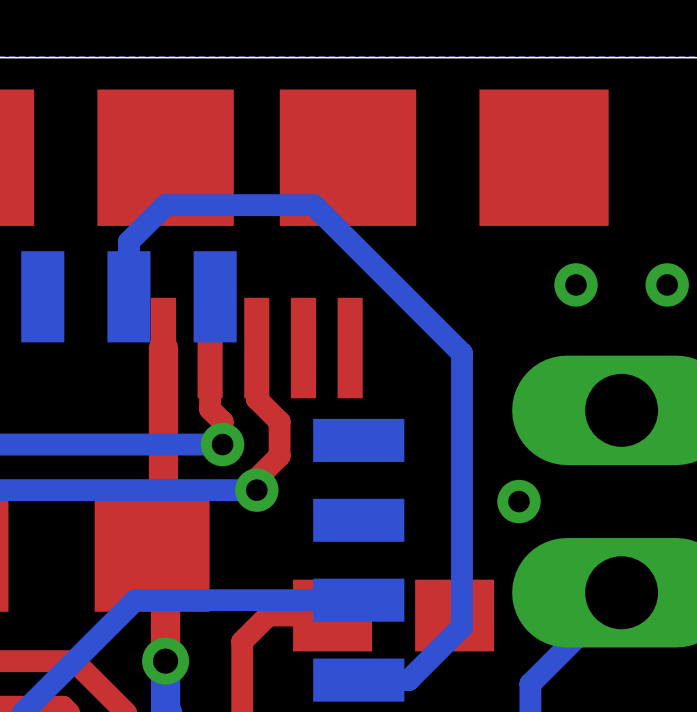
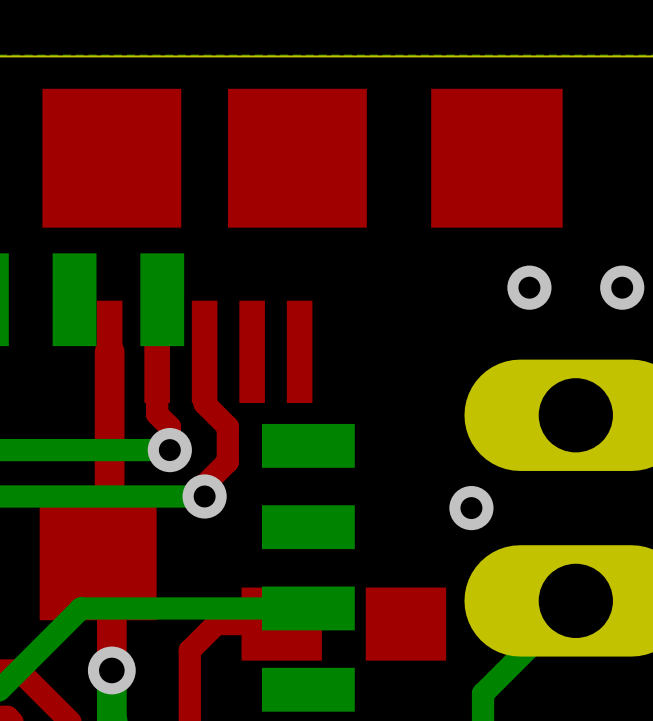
bottom track: (128, 296) (128, 241) (165, 205) (313, 205) (461, 353) (461, 626) (408, 680) (358, 680) -> none

